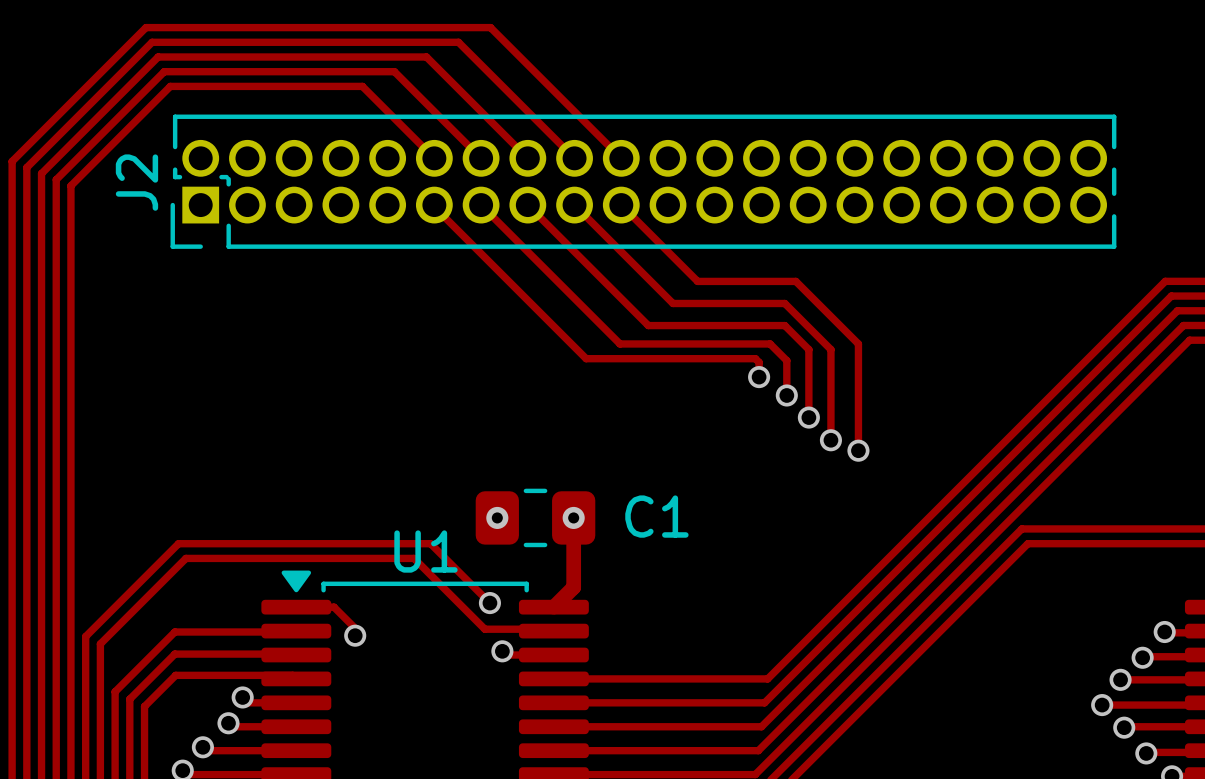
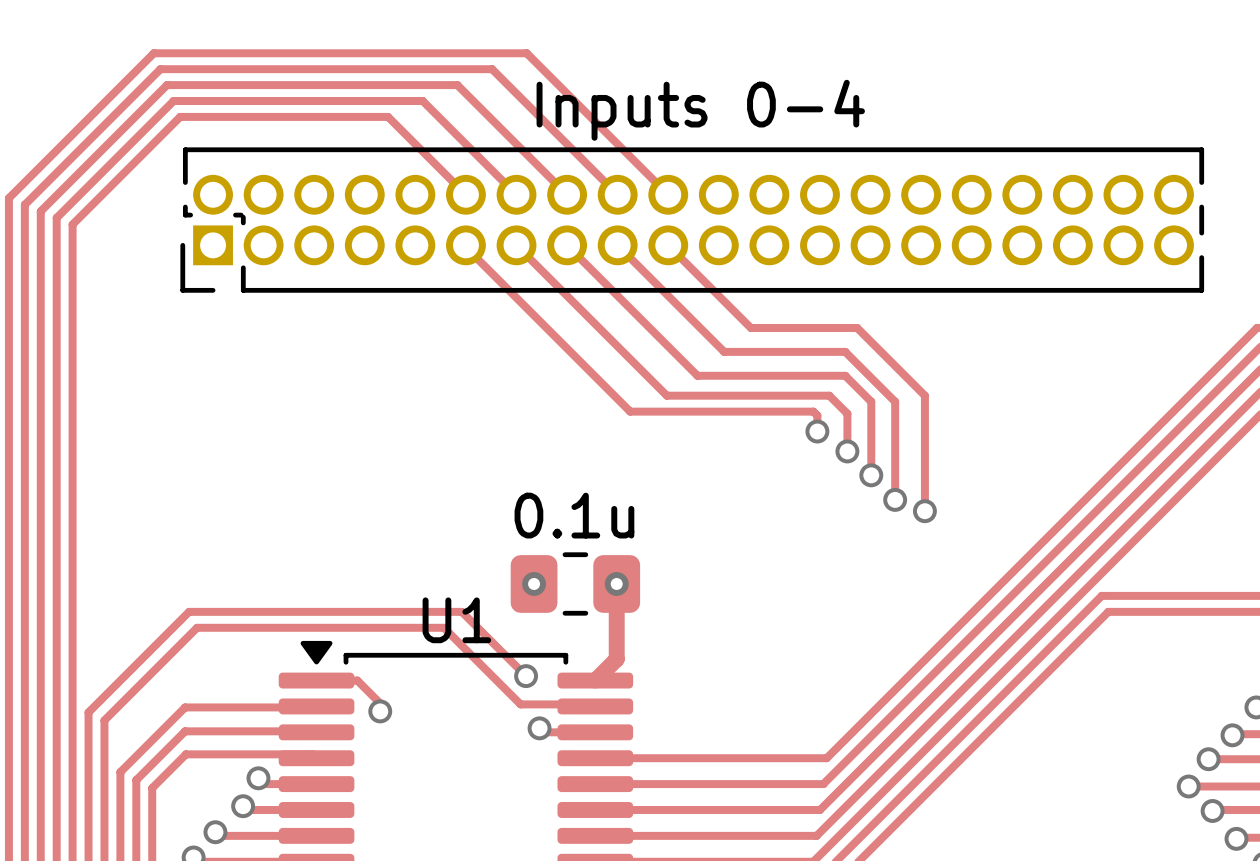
J2 value: none -> Inputs 0-4 (700, 110)
J2 name: J2 (136, 182) -> none
C1 value: none -> 0.1u (574, 515)
C1 name: C1 (656, 516) -> none

